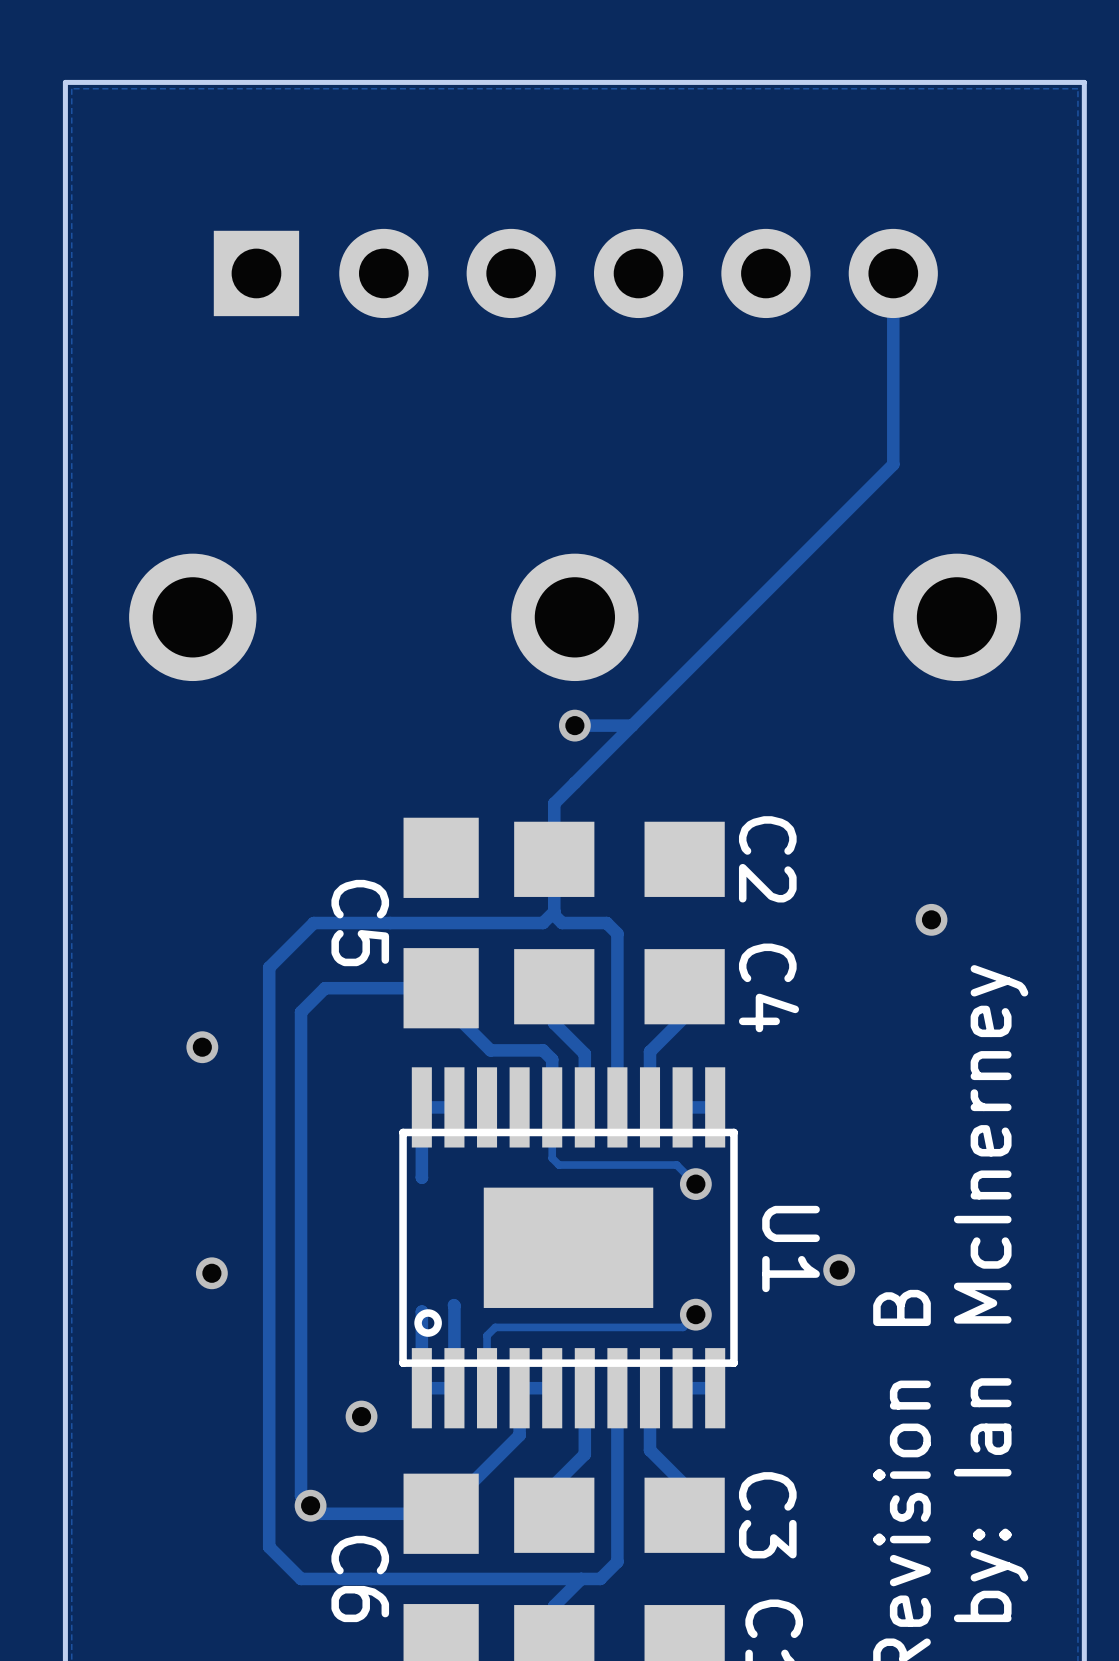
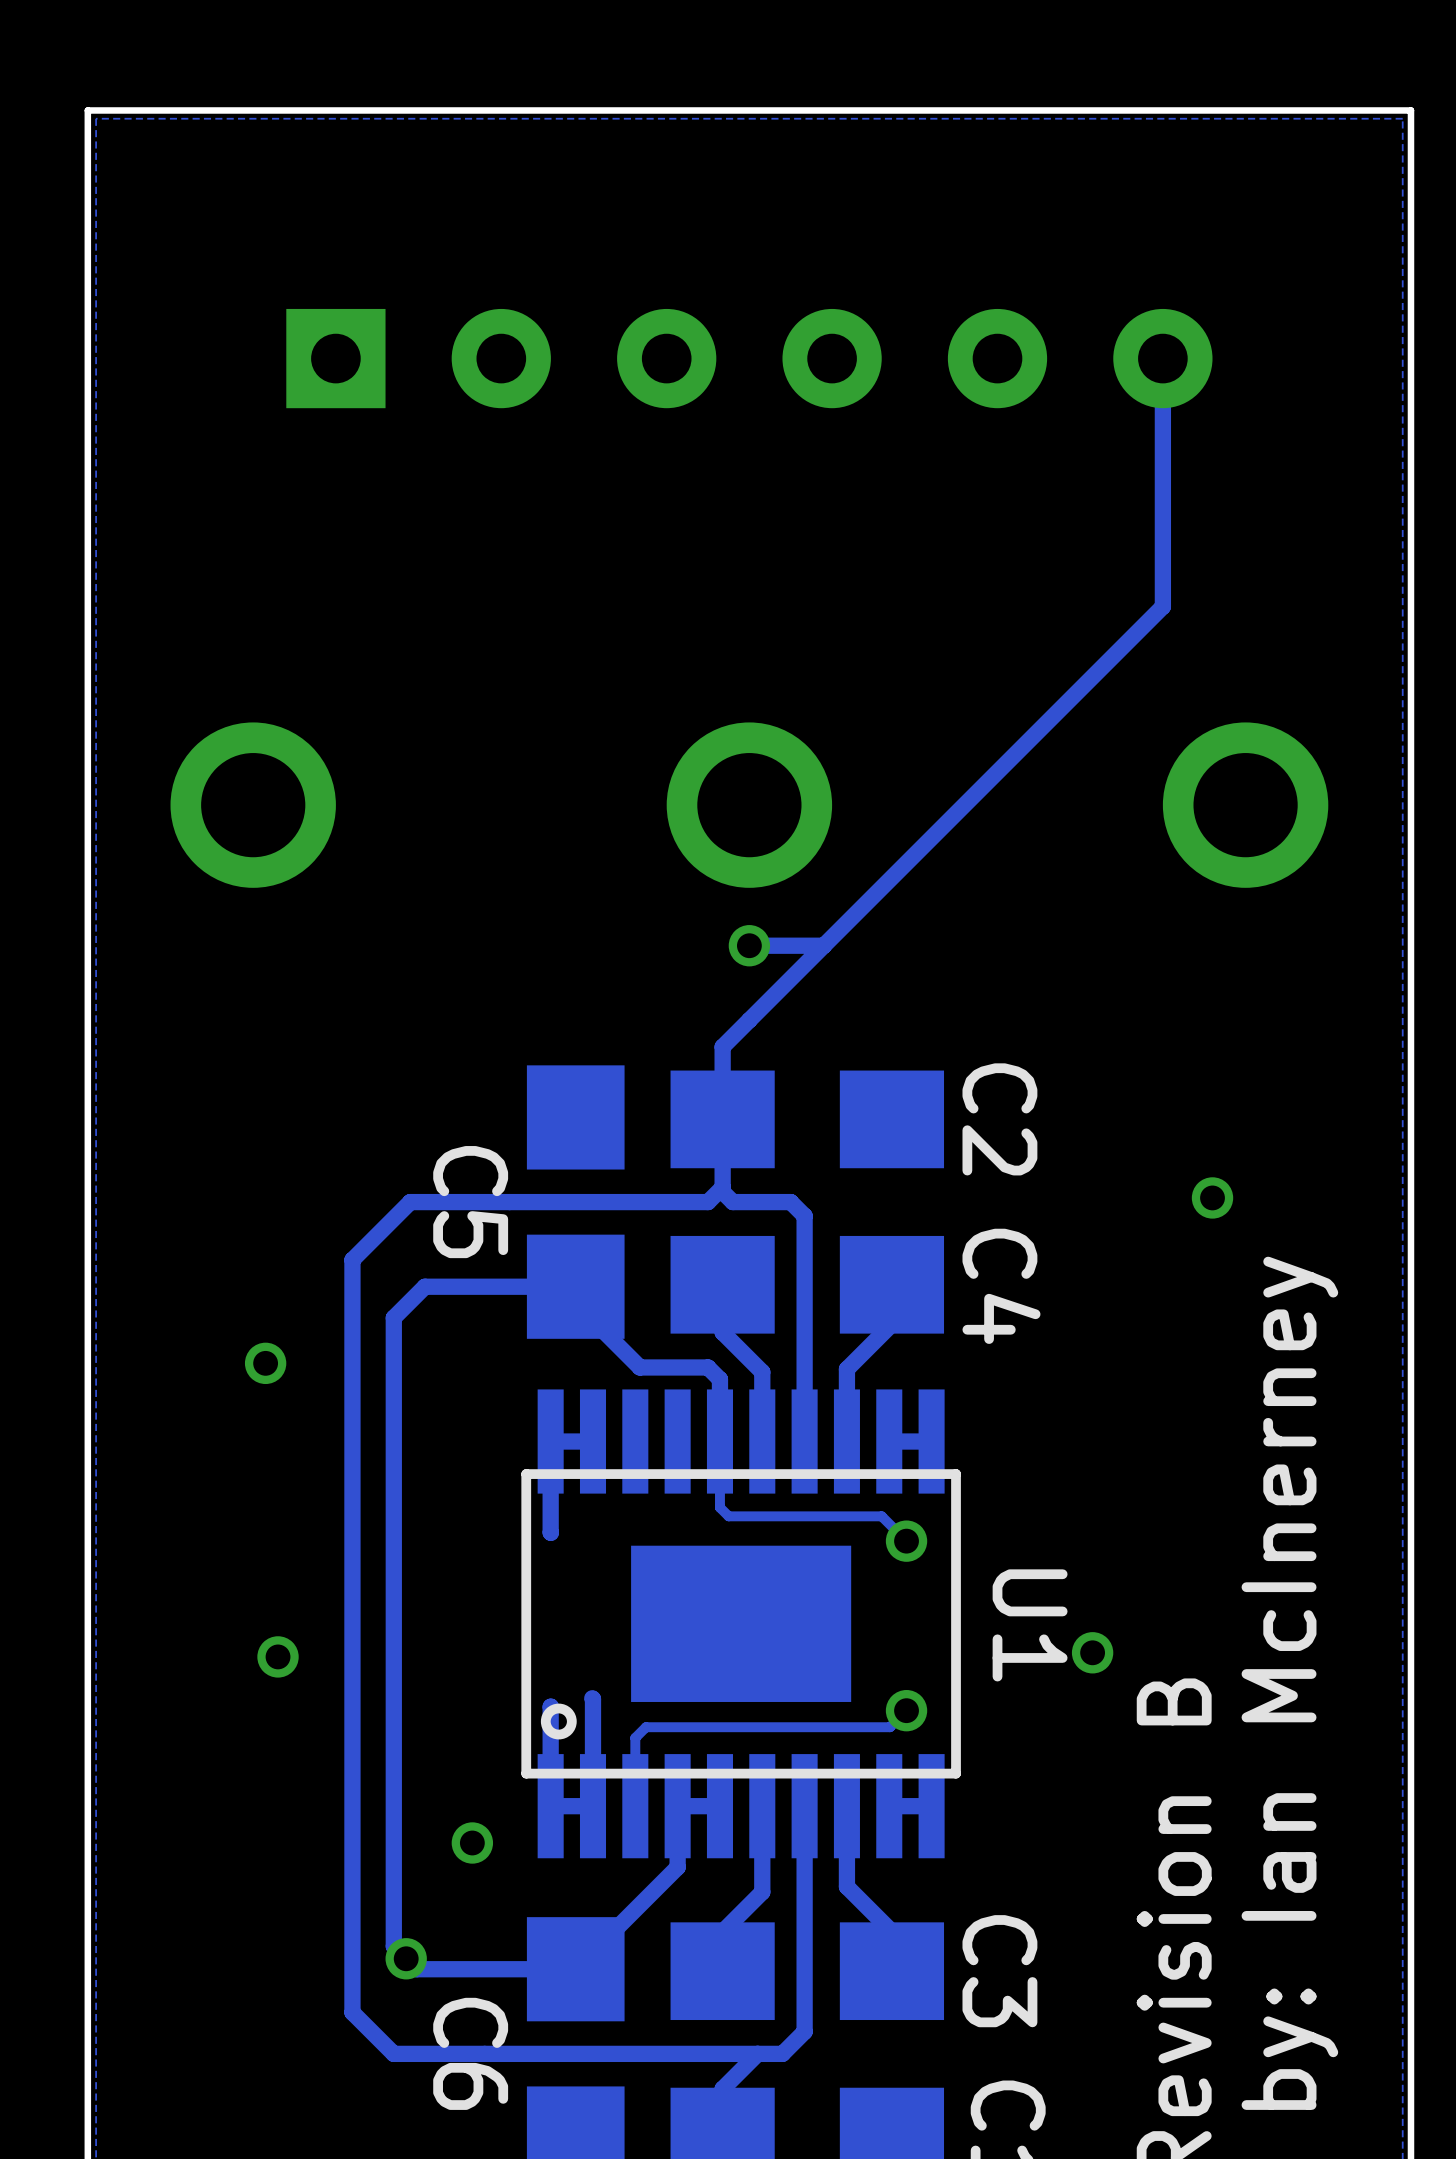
part footprint: [213, 228, 938, 319] -> [286, 308, 1213, 409]

